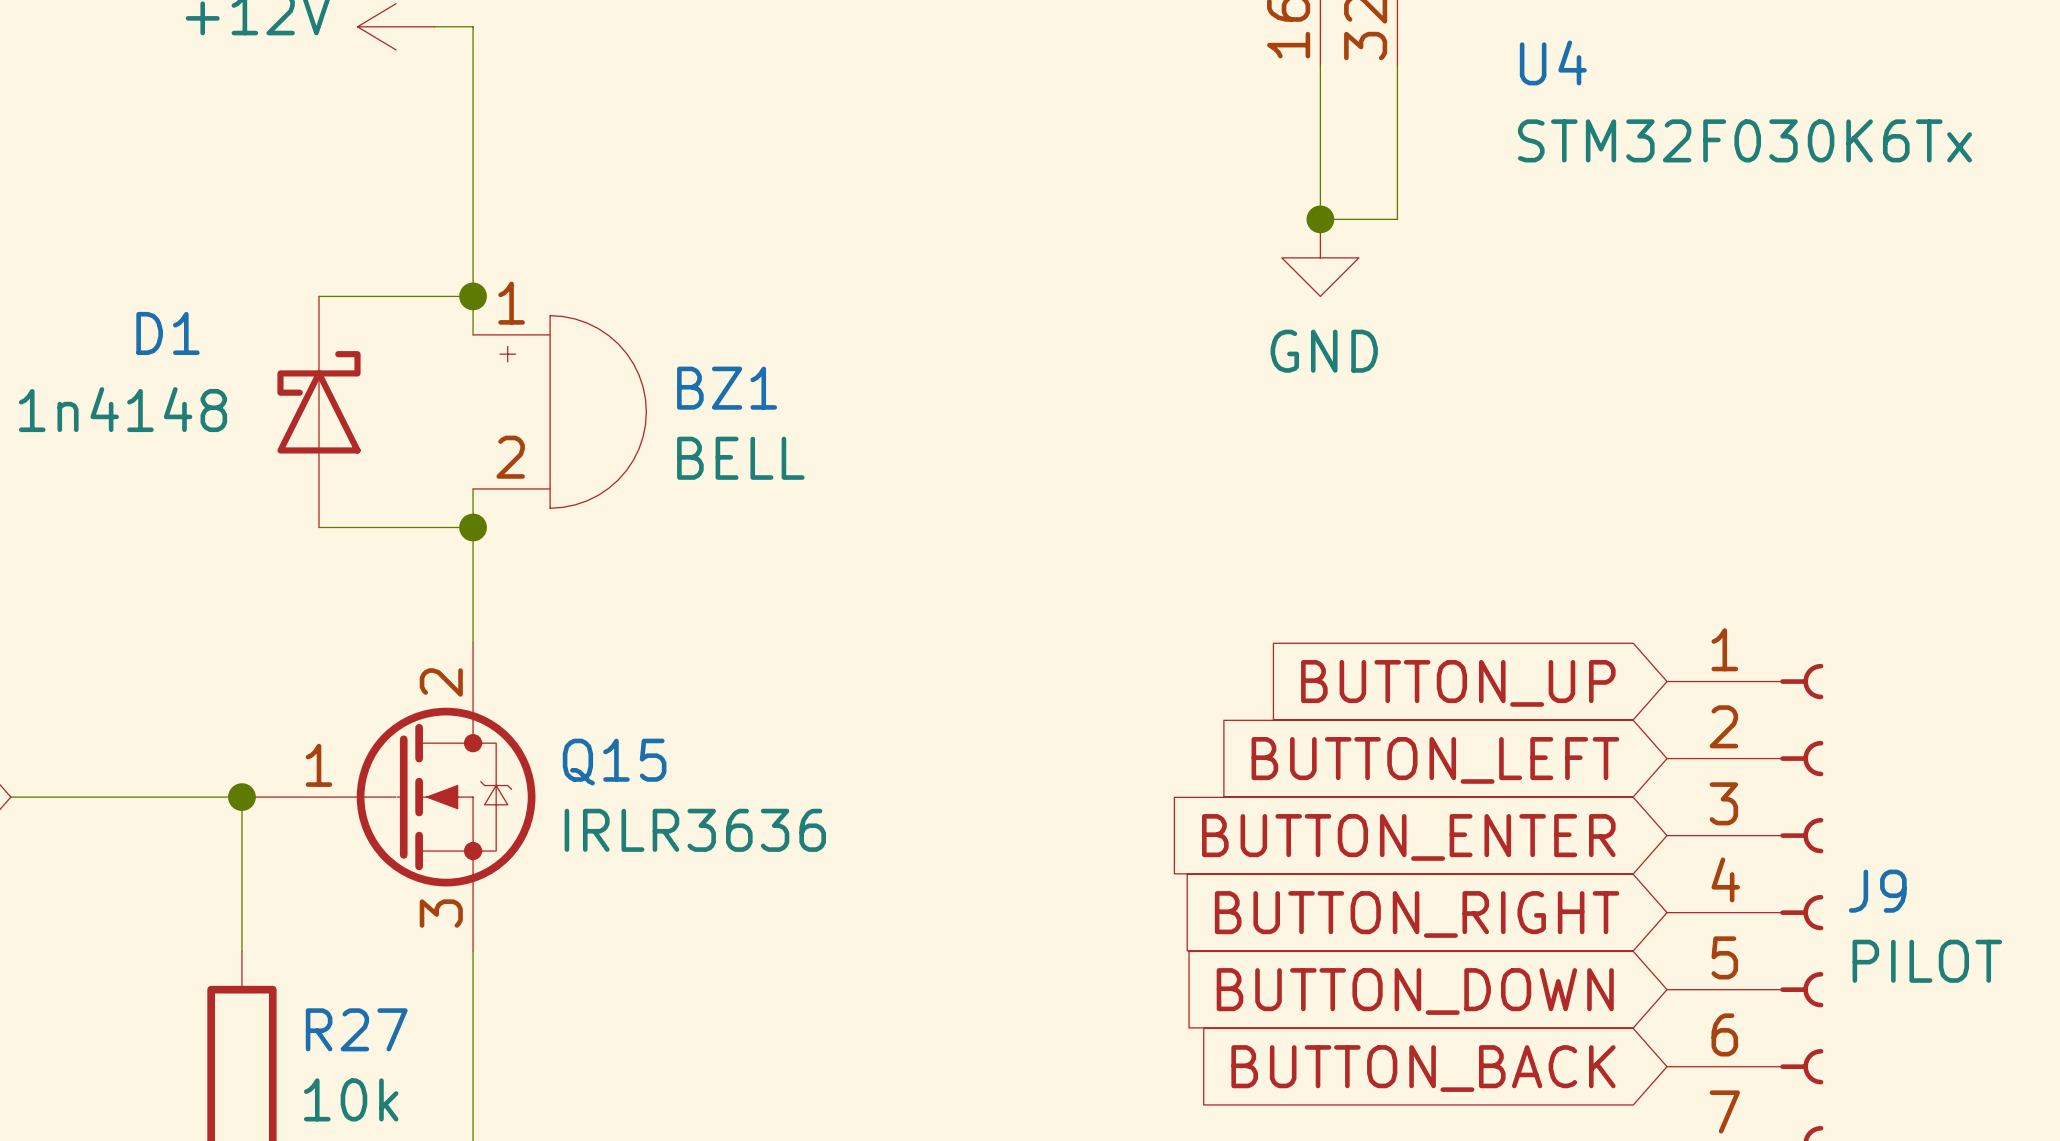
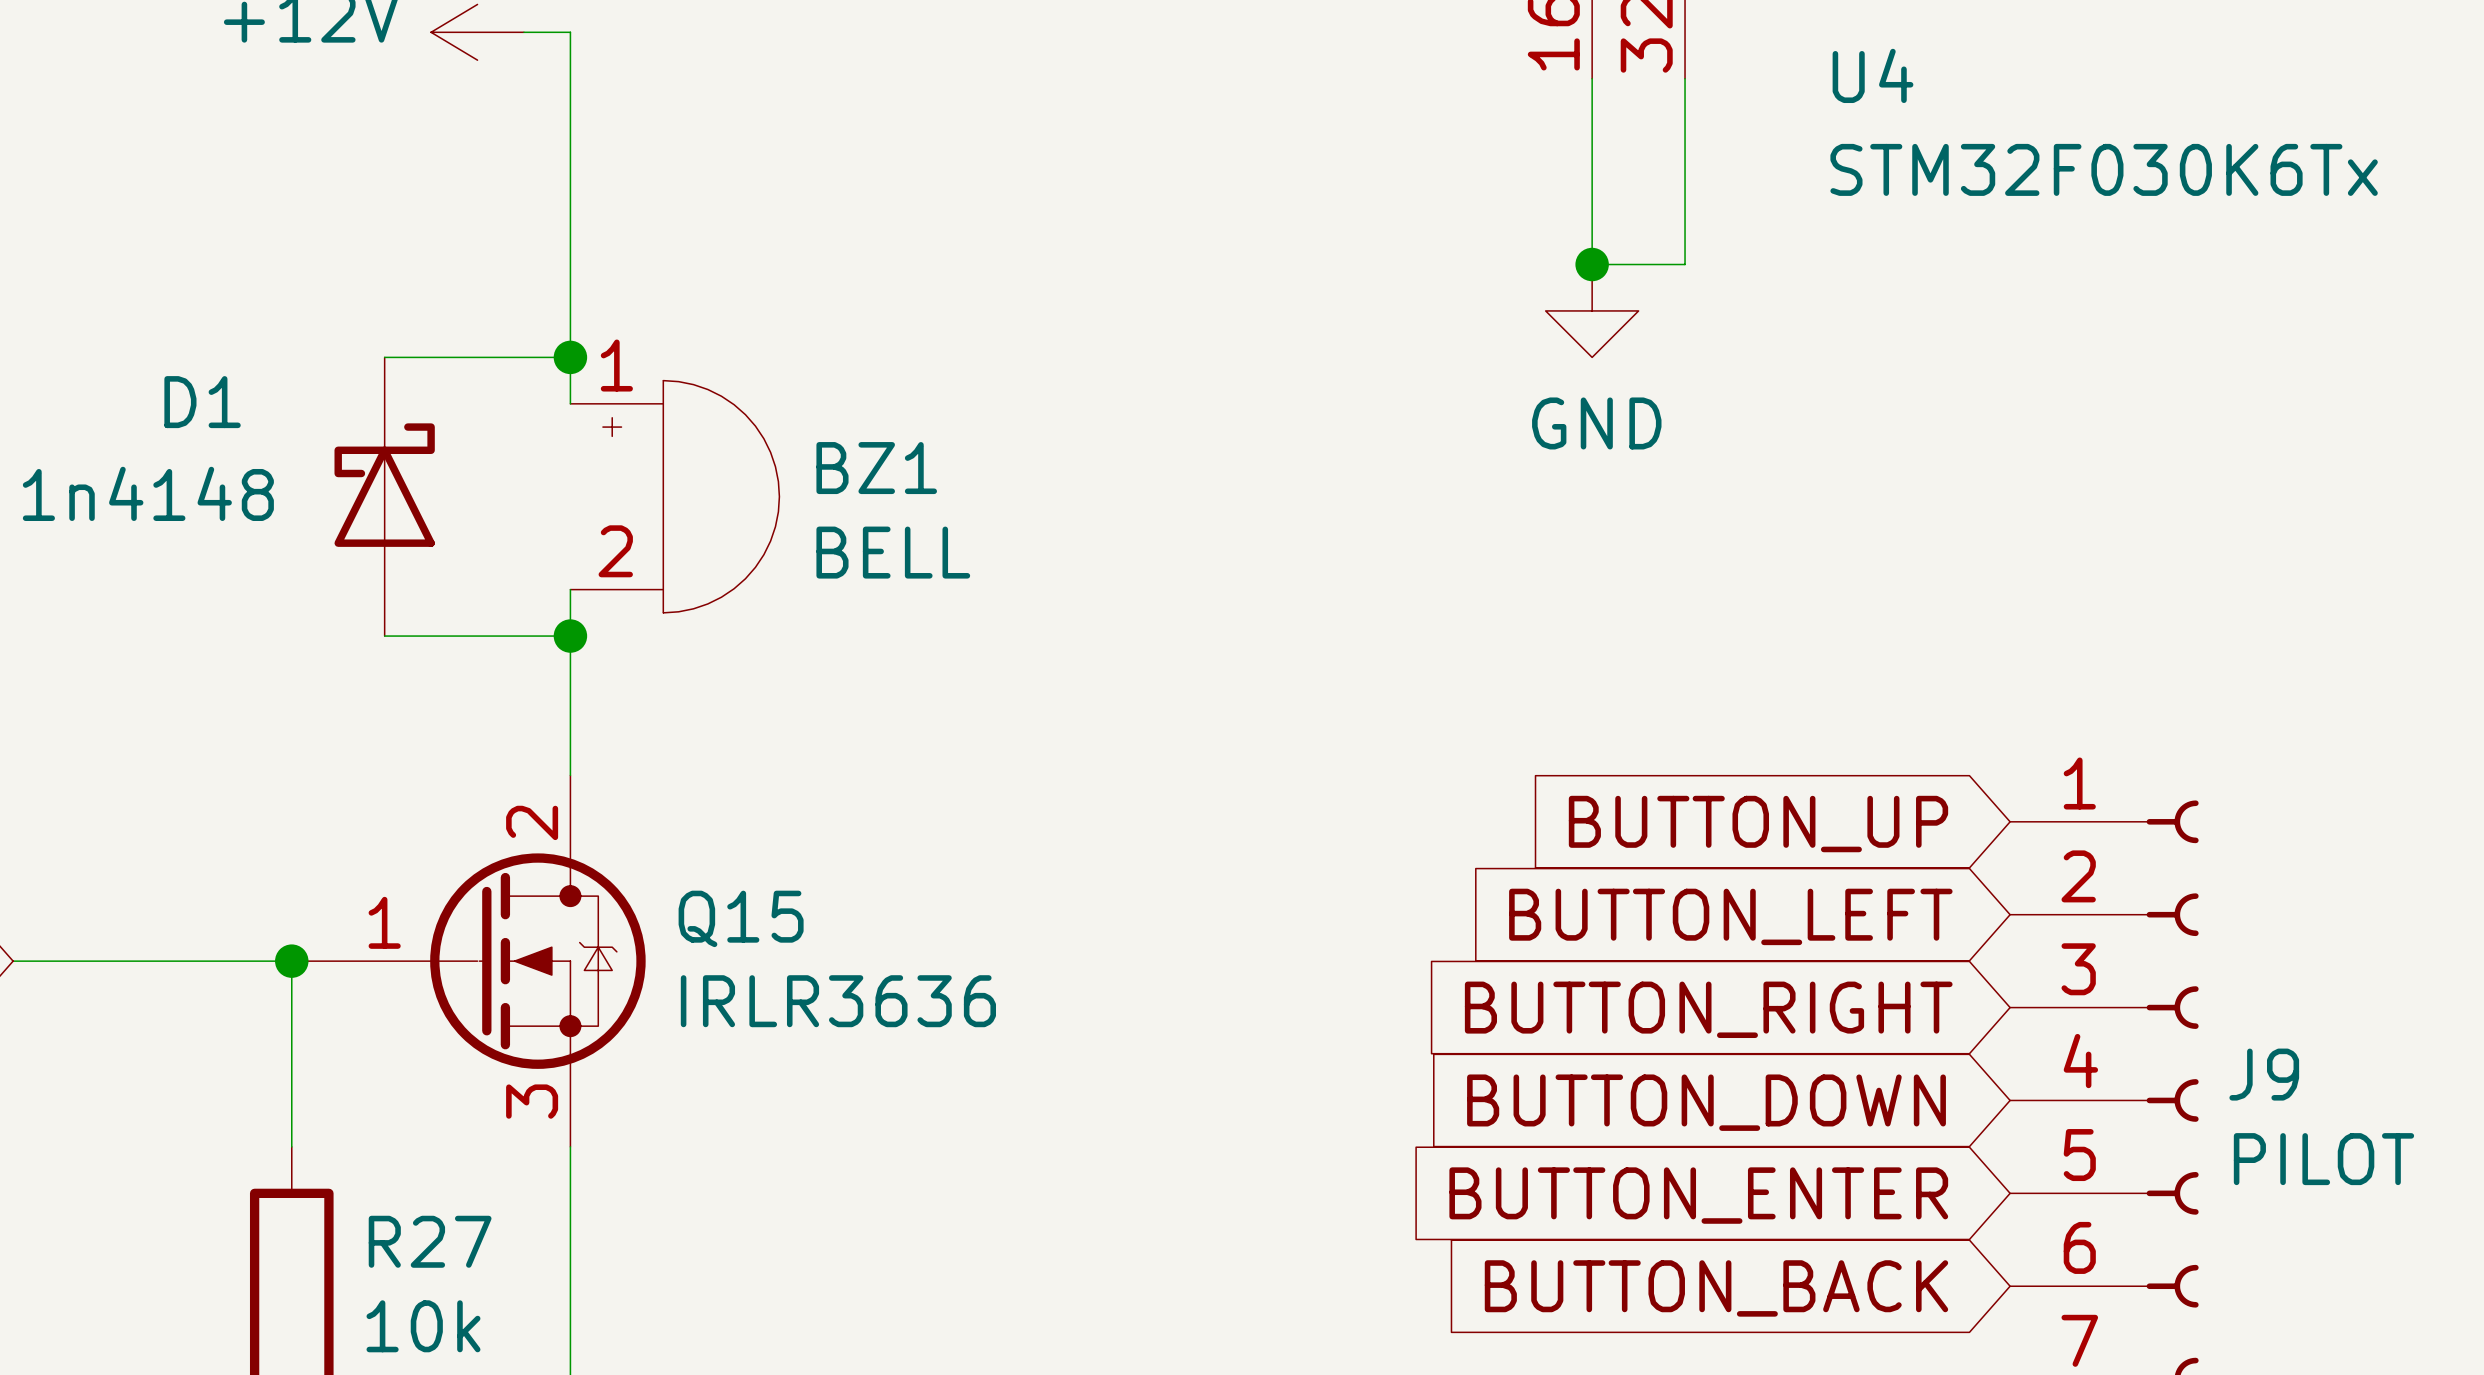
global label: BUTTON_ENTER (1408, 837) -> BUTTON_RIGHT (1708, 1009)
global label: BUTTON_RIGHT (1417, 914) -> BUTTON_DOWN (1706, 1102)
global label: BUTTON_DOWN (1415, 991) -> BUTTON_ENTER (1698, 1195)

